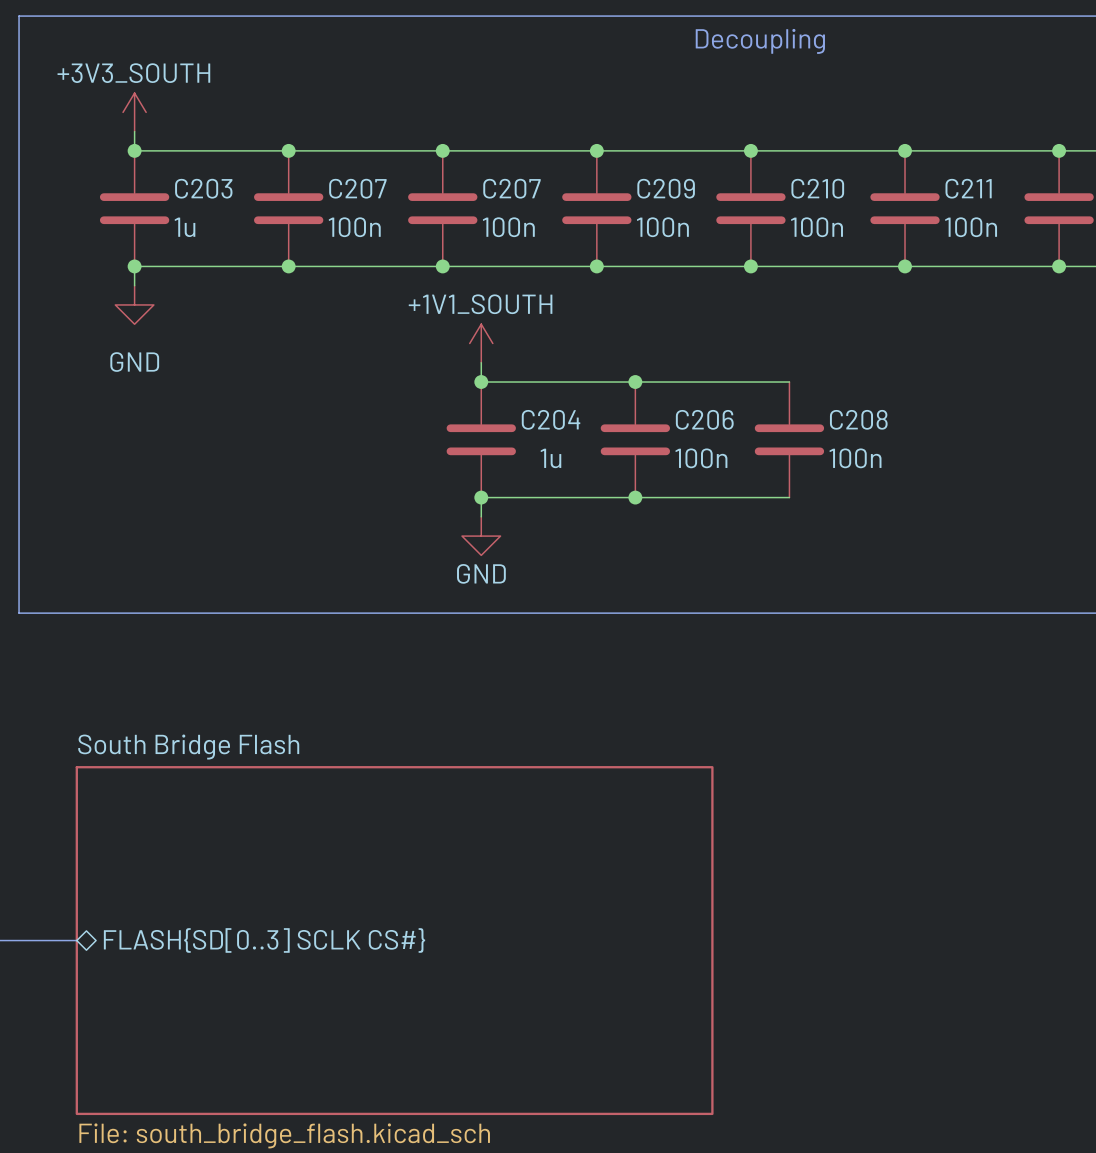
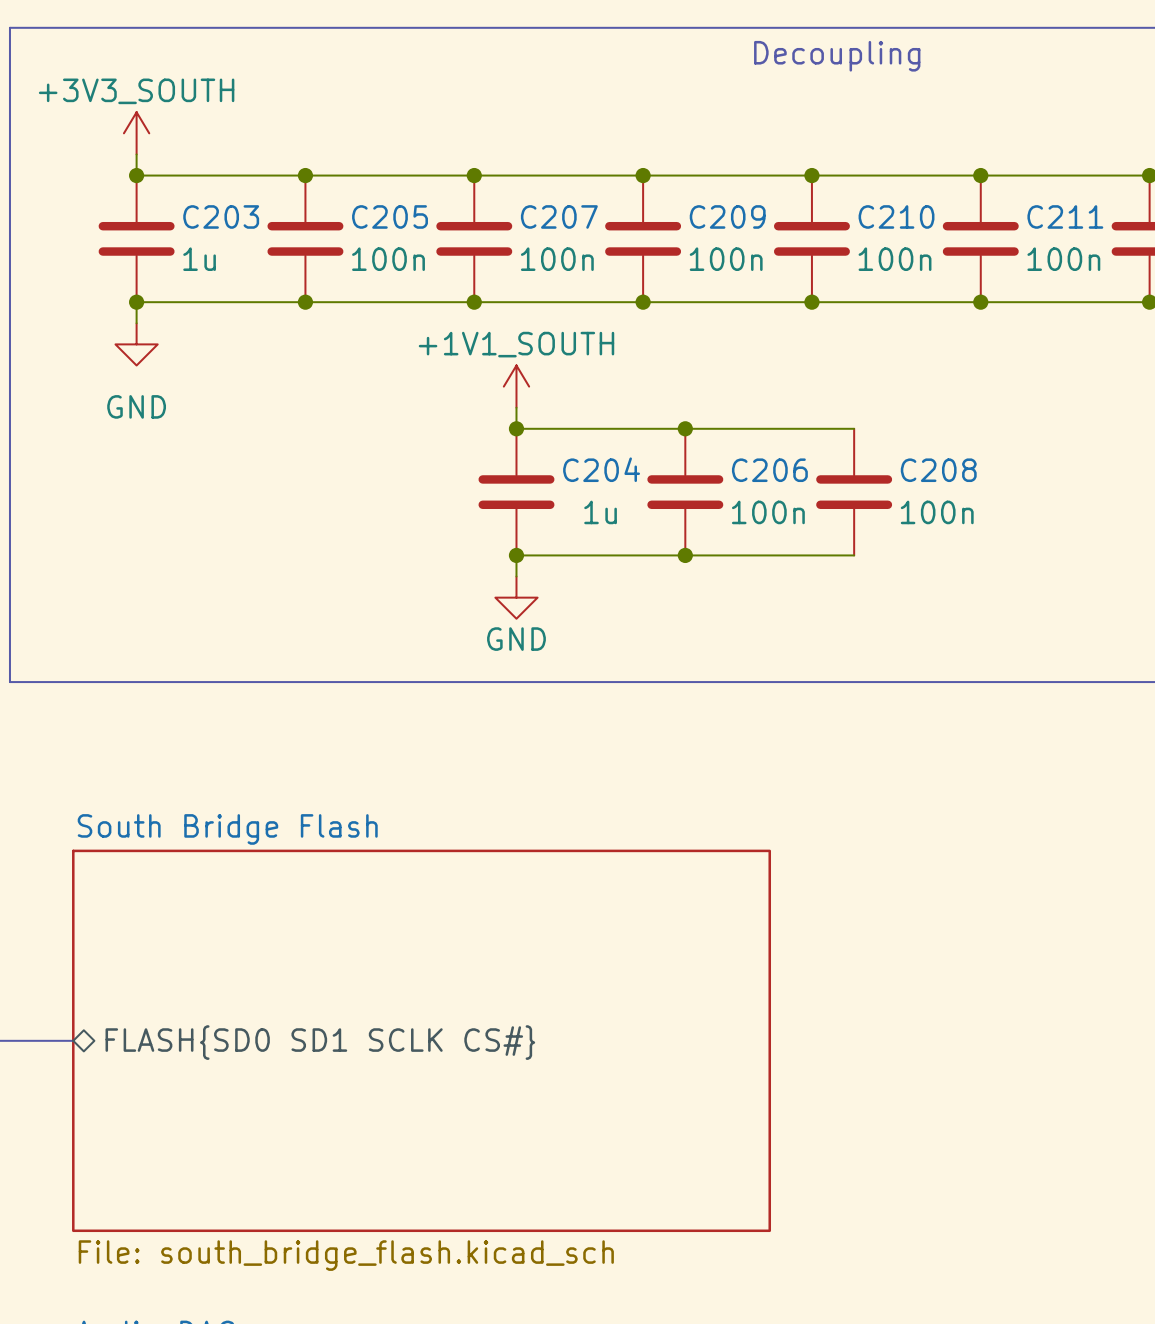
C207 name: C207 (357, 188) -> C205 (390, 216)
sheet pin: FLASH{SD[0..3] SCLK CS#} (264, 940) -> FLASH{SD0 SD1 SCLK CS#} (320, 1042)

